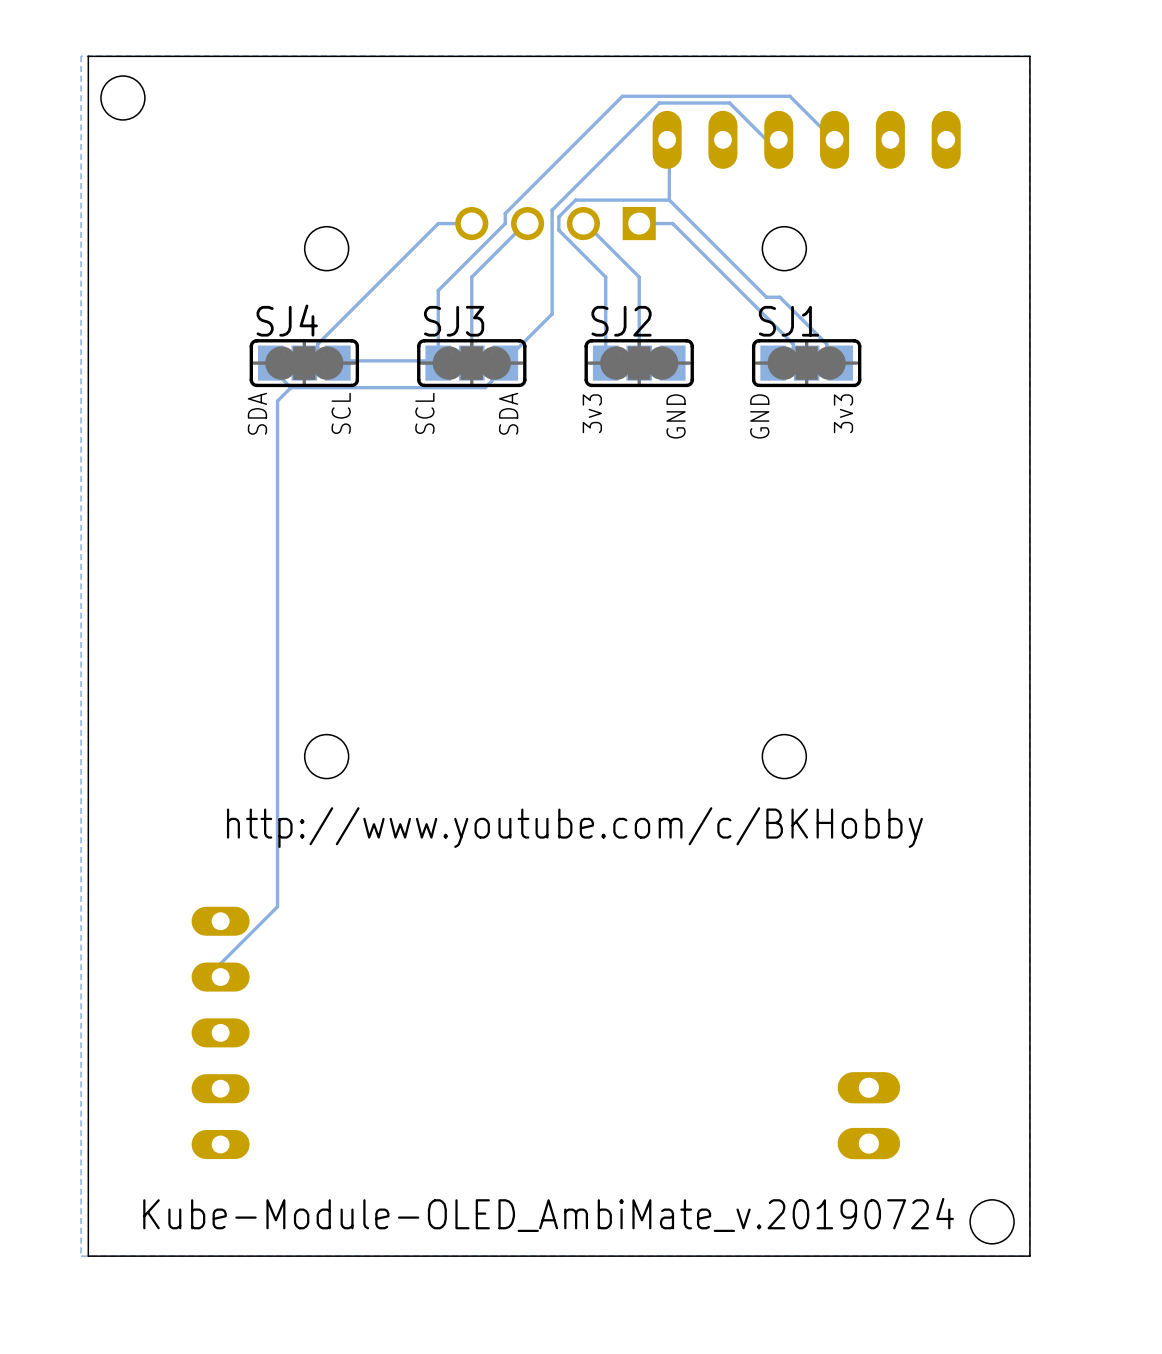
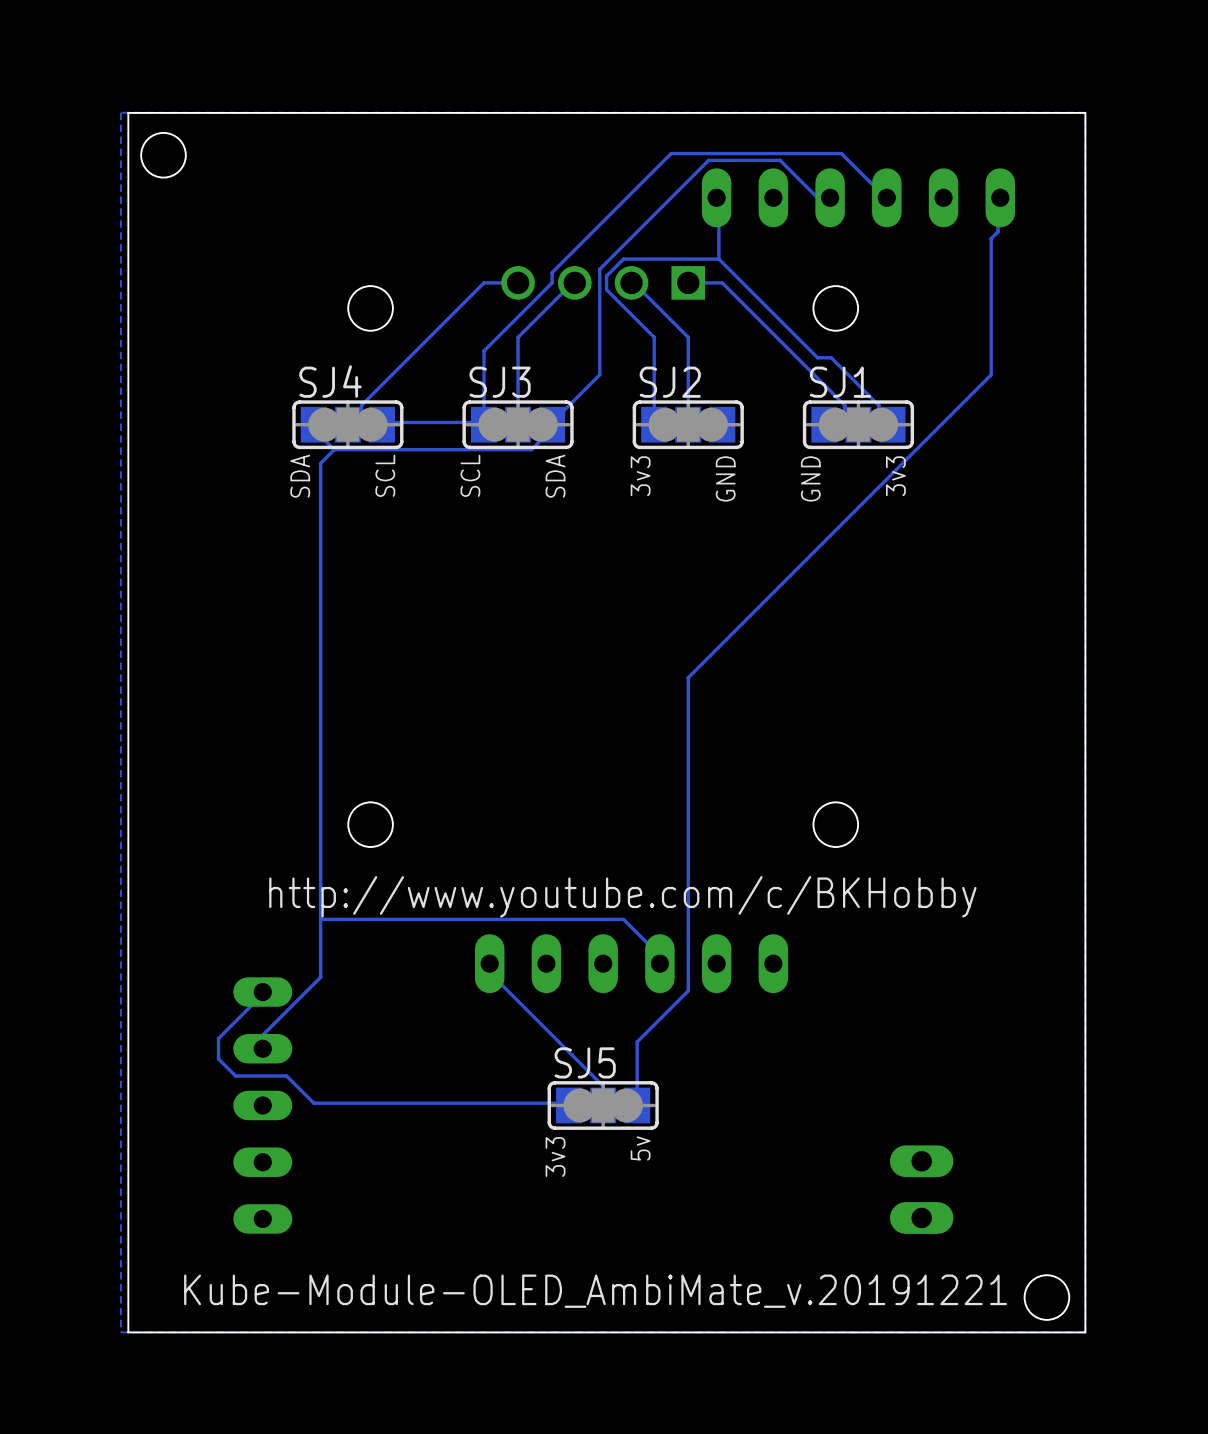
track: none -> (1000, 197) (998, 197) (998, 231) (991, 238) (991, 374) (688, 677) (688, 990) (637, 1041) (637, 1105)
track: none -> (320, 919) (623, 919) (657, 953) (657, 963) (659, 963)
track: none -> (489, 963) (490, 973) (603, 1086) (603, 1105)
part: none -> (631, 963)
track: none -> (262, 992) (262, 994) (218, 1038) (218, 1058) (235, 1075) (286, 1075) (313, 1103) (569, 1103) (569, 1105)
SJ5: none -> (603, 1105)
text: none -> 5v (640, 1148)
text: none -> 3v3 (555, 1156)
text: Kube-Module-OLED_AmbiMate_v.20190724 (548, 1214) -> Kube-Module-OLED_AmbiMate_v.20191221 (595, 1291)

